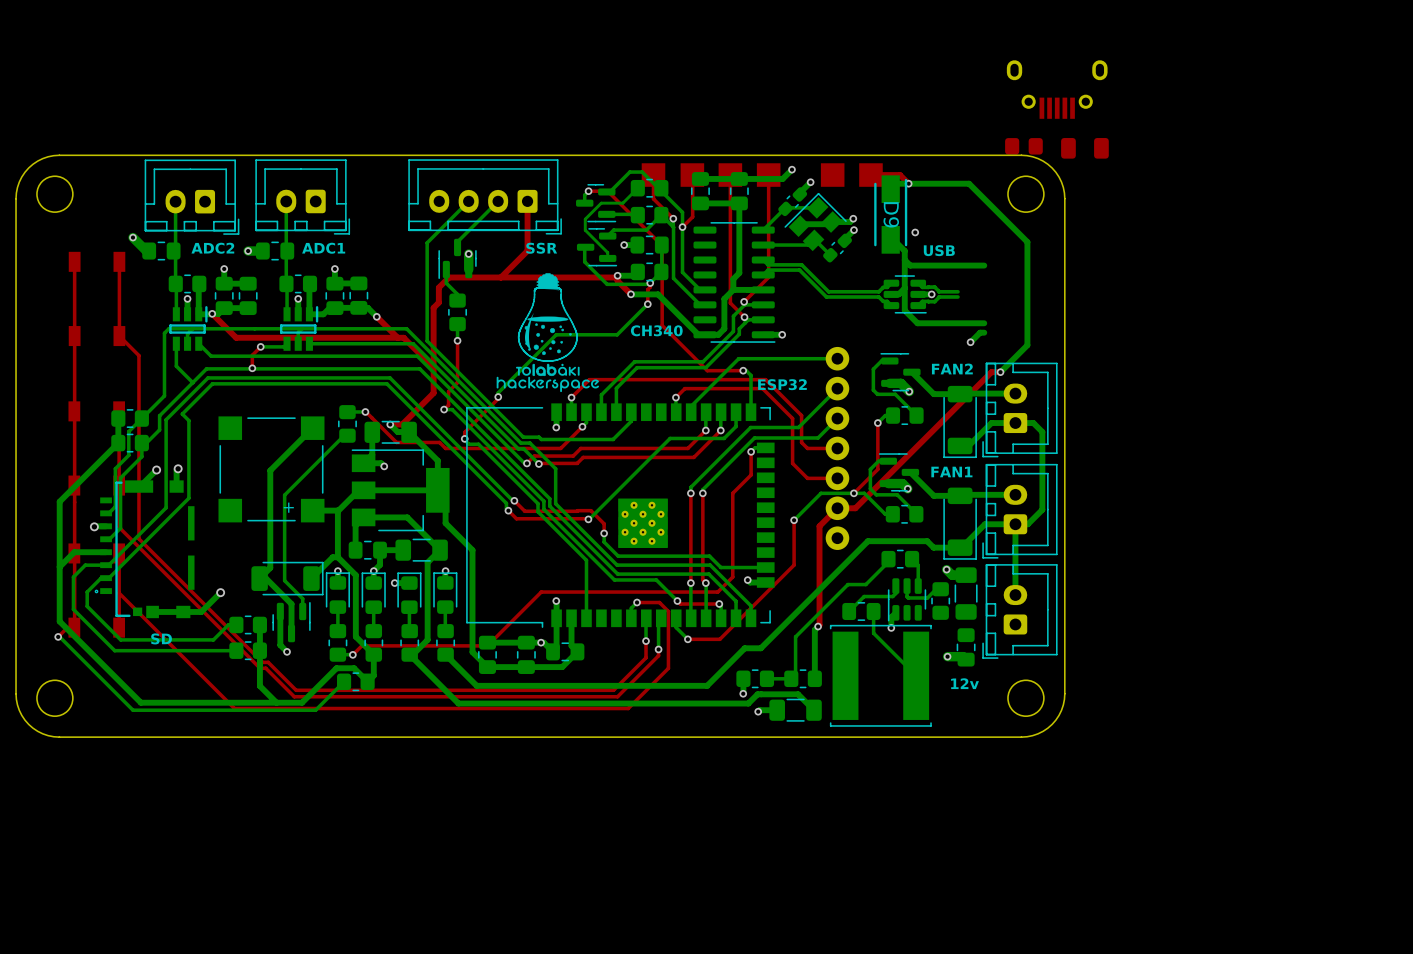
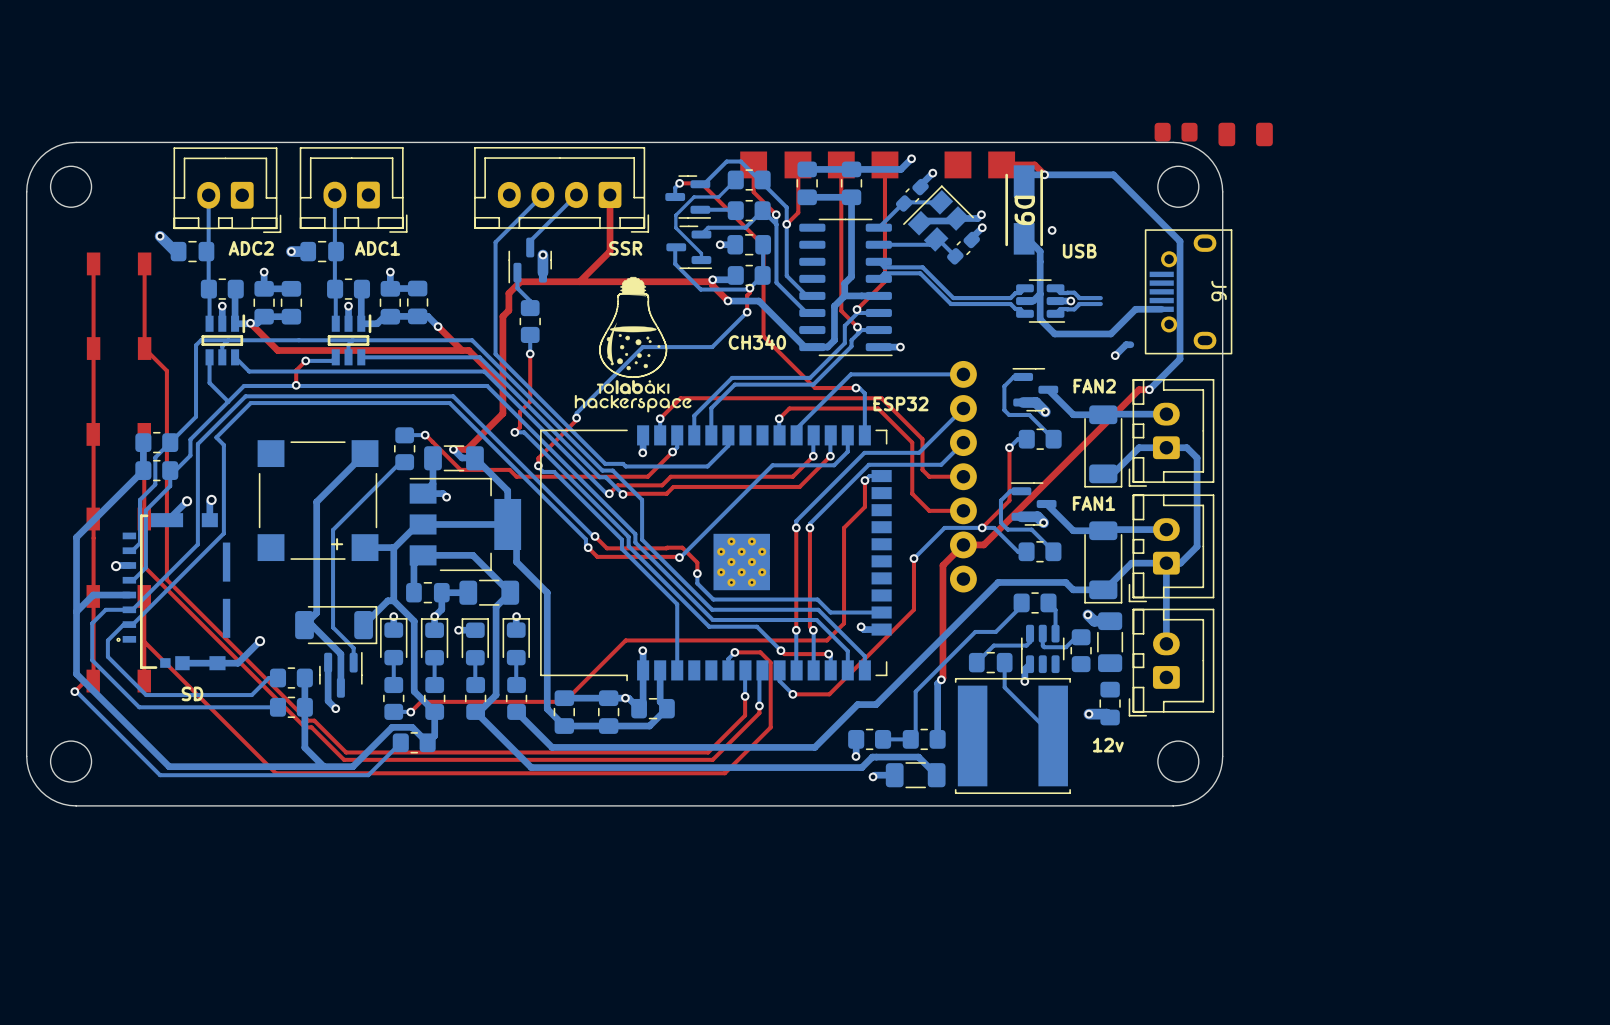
J6 side: top (1057, 89) -> bottom (1188, 291)
bottom track: (904, 260) (910, 265) (984, 265) -> none
bottom track: (984, 323) (966, 323) -> (1161, 309) (1135, 309) (1110, 333)

